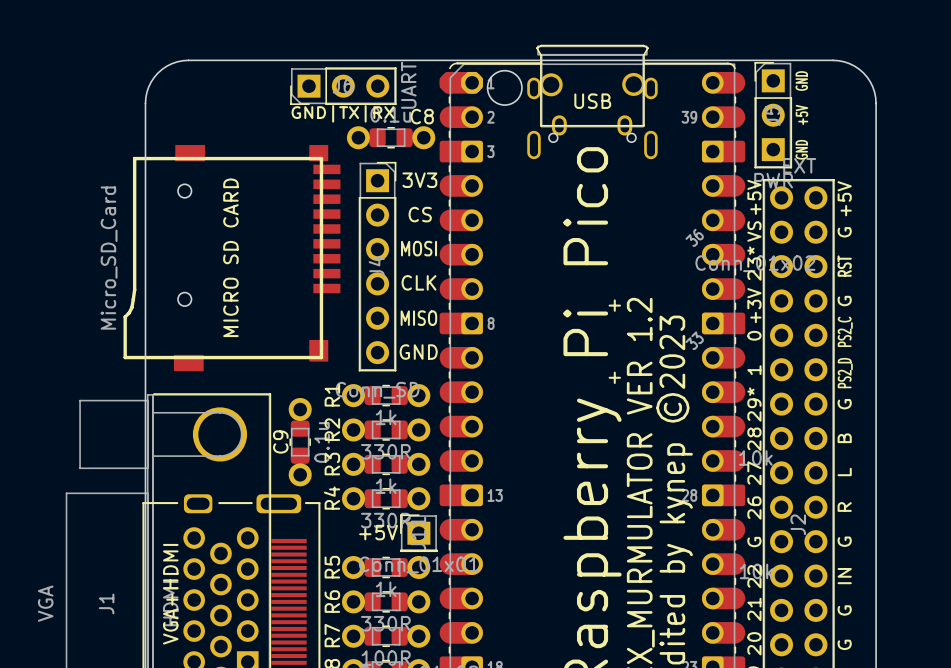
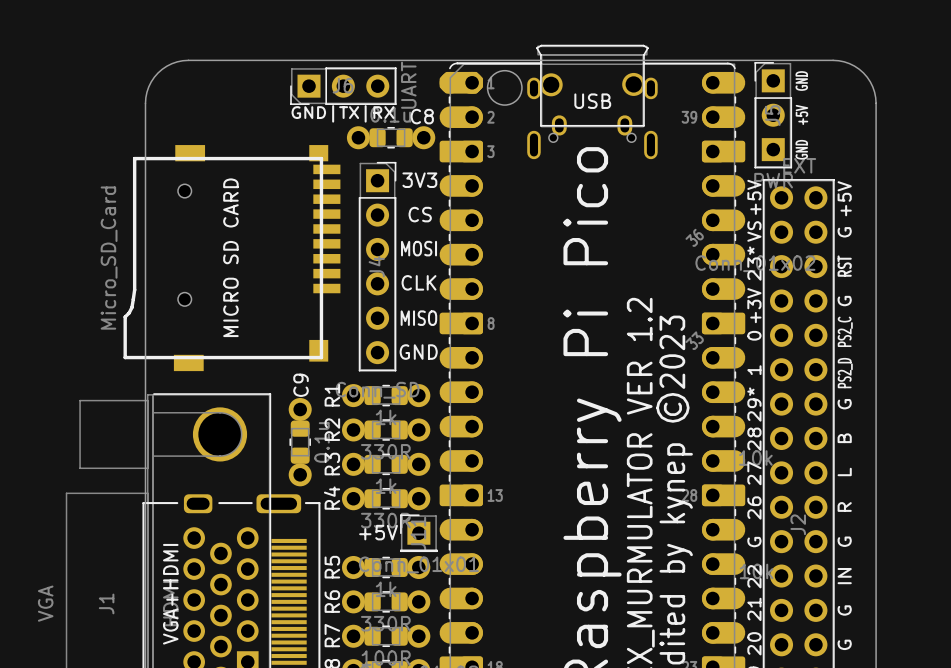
text: + (614, 305) -> none
text: + (614, 377) -> none
C9 name position: C9 (280, 442) -> C9 (301, 385)

